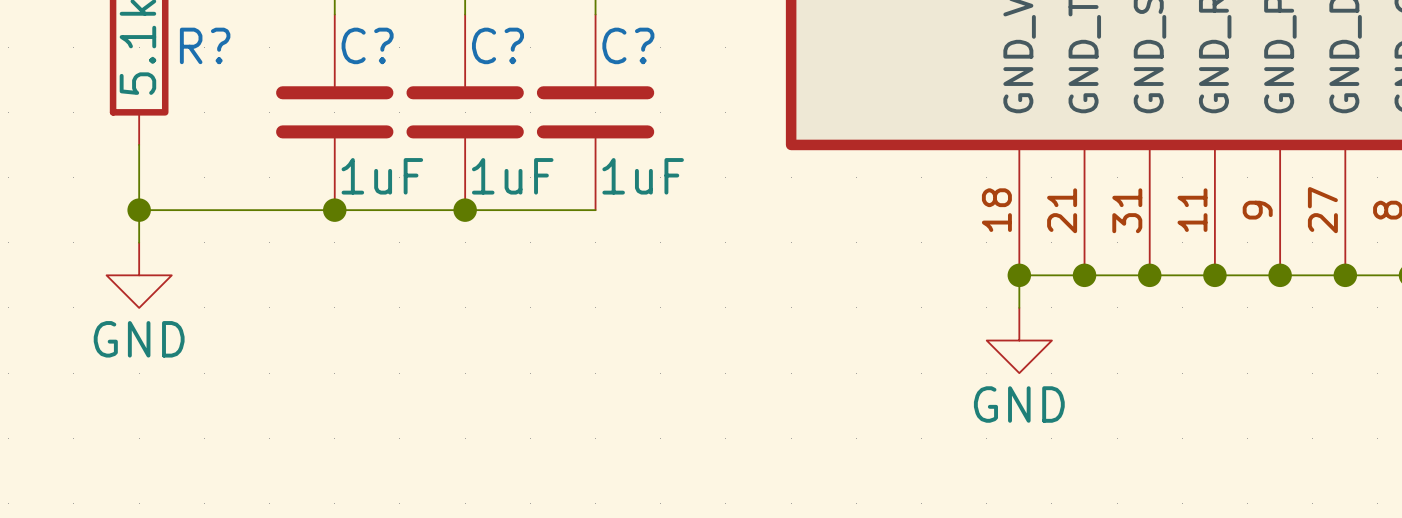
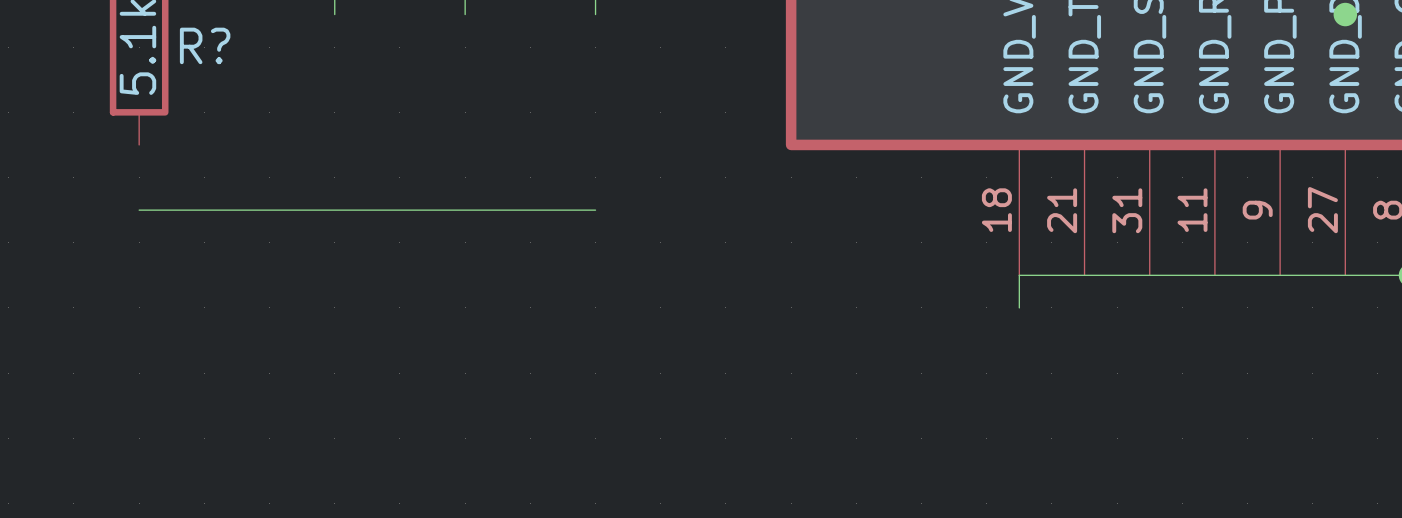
junction: none -> (1345, 14)
C?: 1uF (334, 112) -> none
C?: 1uF (465, 112) -> none
C?: 1uF (595, 112) -> none
wire: (139, 144) (139, 242) -> none
junction: (139, 210) -> none
junction: (334, 210) -> none
junction: (465, 210) -> none
power symbol: GND (139, 275) -> none
junction: (1019, 275) -> none
junction: (1084, 275) -> none
junction: (1149, 275) -> none
junction: (1214, 275) -> none
junction: (1280, 275) -> none
junction: (1345, 275) -> none
power symbol: GND (1019, 340) -> none

